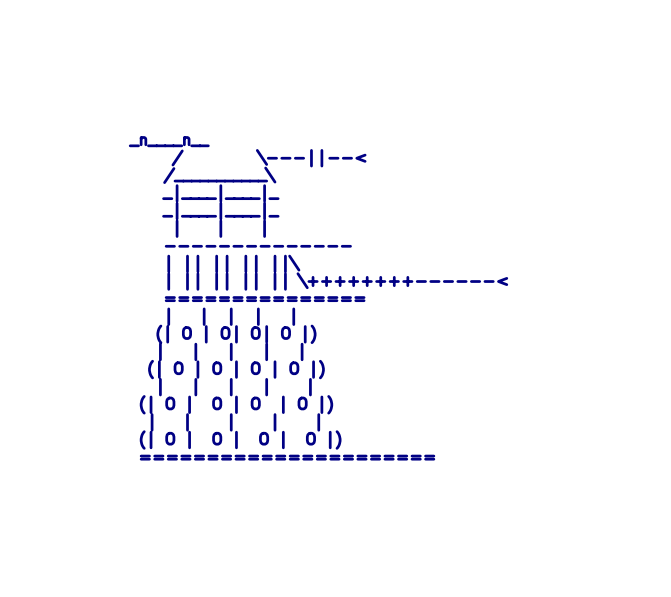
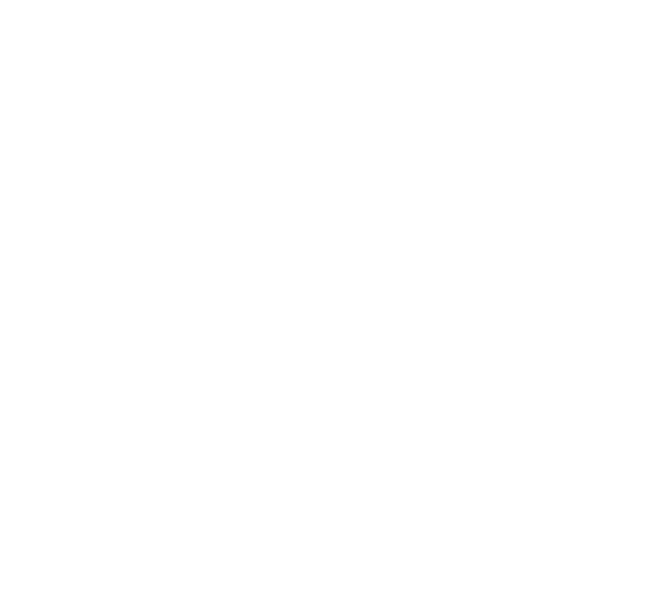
text: _n____n__ (169, 141) -> none
text: / \---||--< (269, 158) -> none
text: /___________\ (219, 175) -> none
text: _|____|____|_ (220, 193) -> none
text: _|____|____|_ (220, 211) -> none
text: | | | (220, 228) -> none
text: -------------- (258, 246) -> none
text: | || || || ||\ (233, 263) -> none
text: | || || || || \++++++++------< (337, 281) -> none
text: =============== (265, 299) -> none
text: | | | | | (231, 316) -> none
text: (| O | O| O| O |) (236, 334) -> none
text: | | | | | (231, 351) -> none
text: (| O | O | O | O |) (236, 369) -> none
text: | | | | | (235, 387) -> none
text: (| O | O | O | O |) (236, 404) -> none
text: | | | | | (235, 422) -> none
text: (| O | O | O | O |) (240, 440) -> none
text: ====================== (287, 457) -> none

